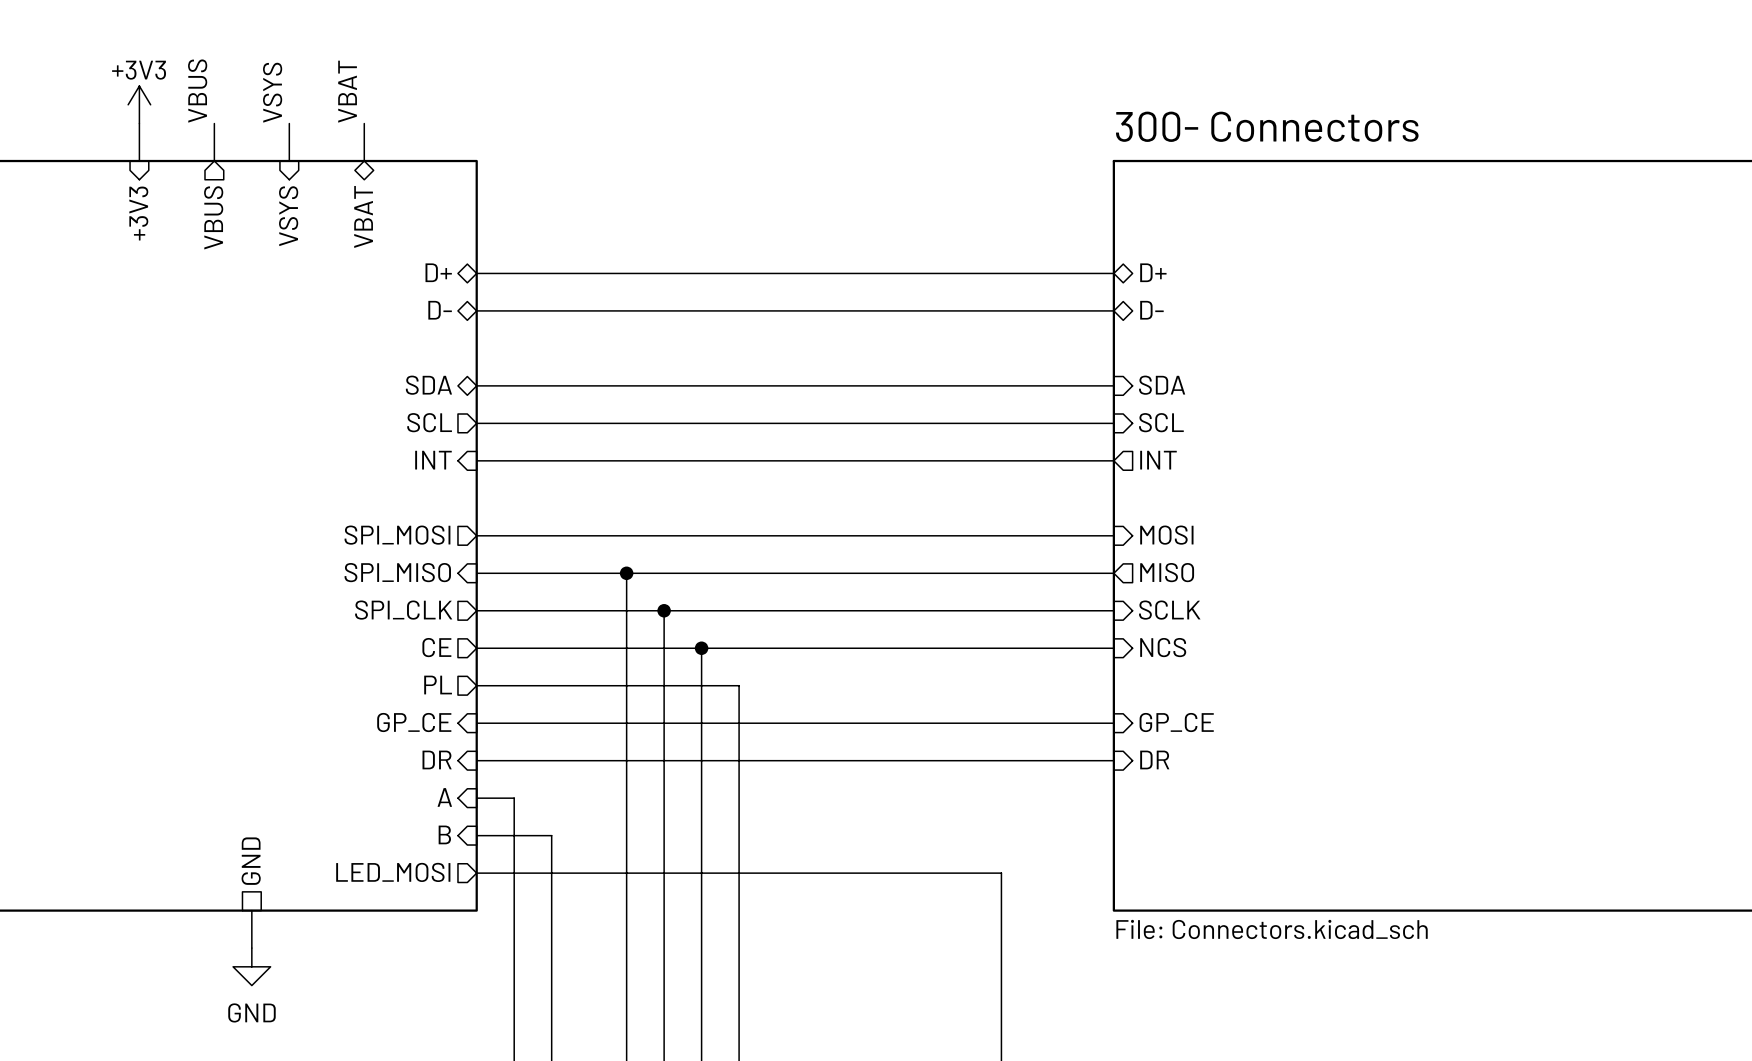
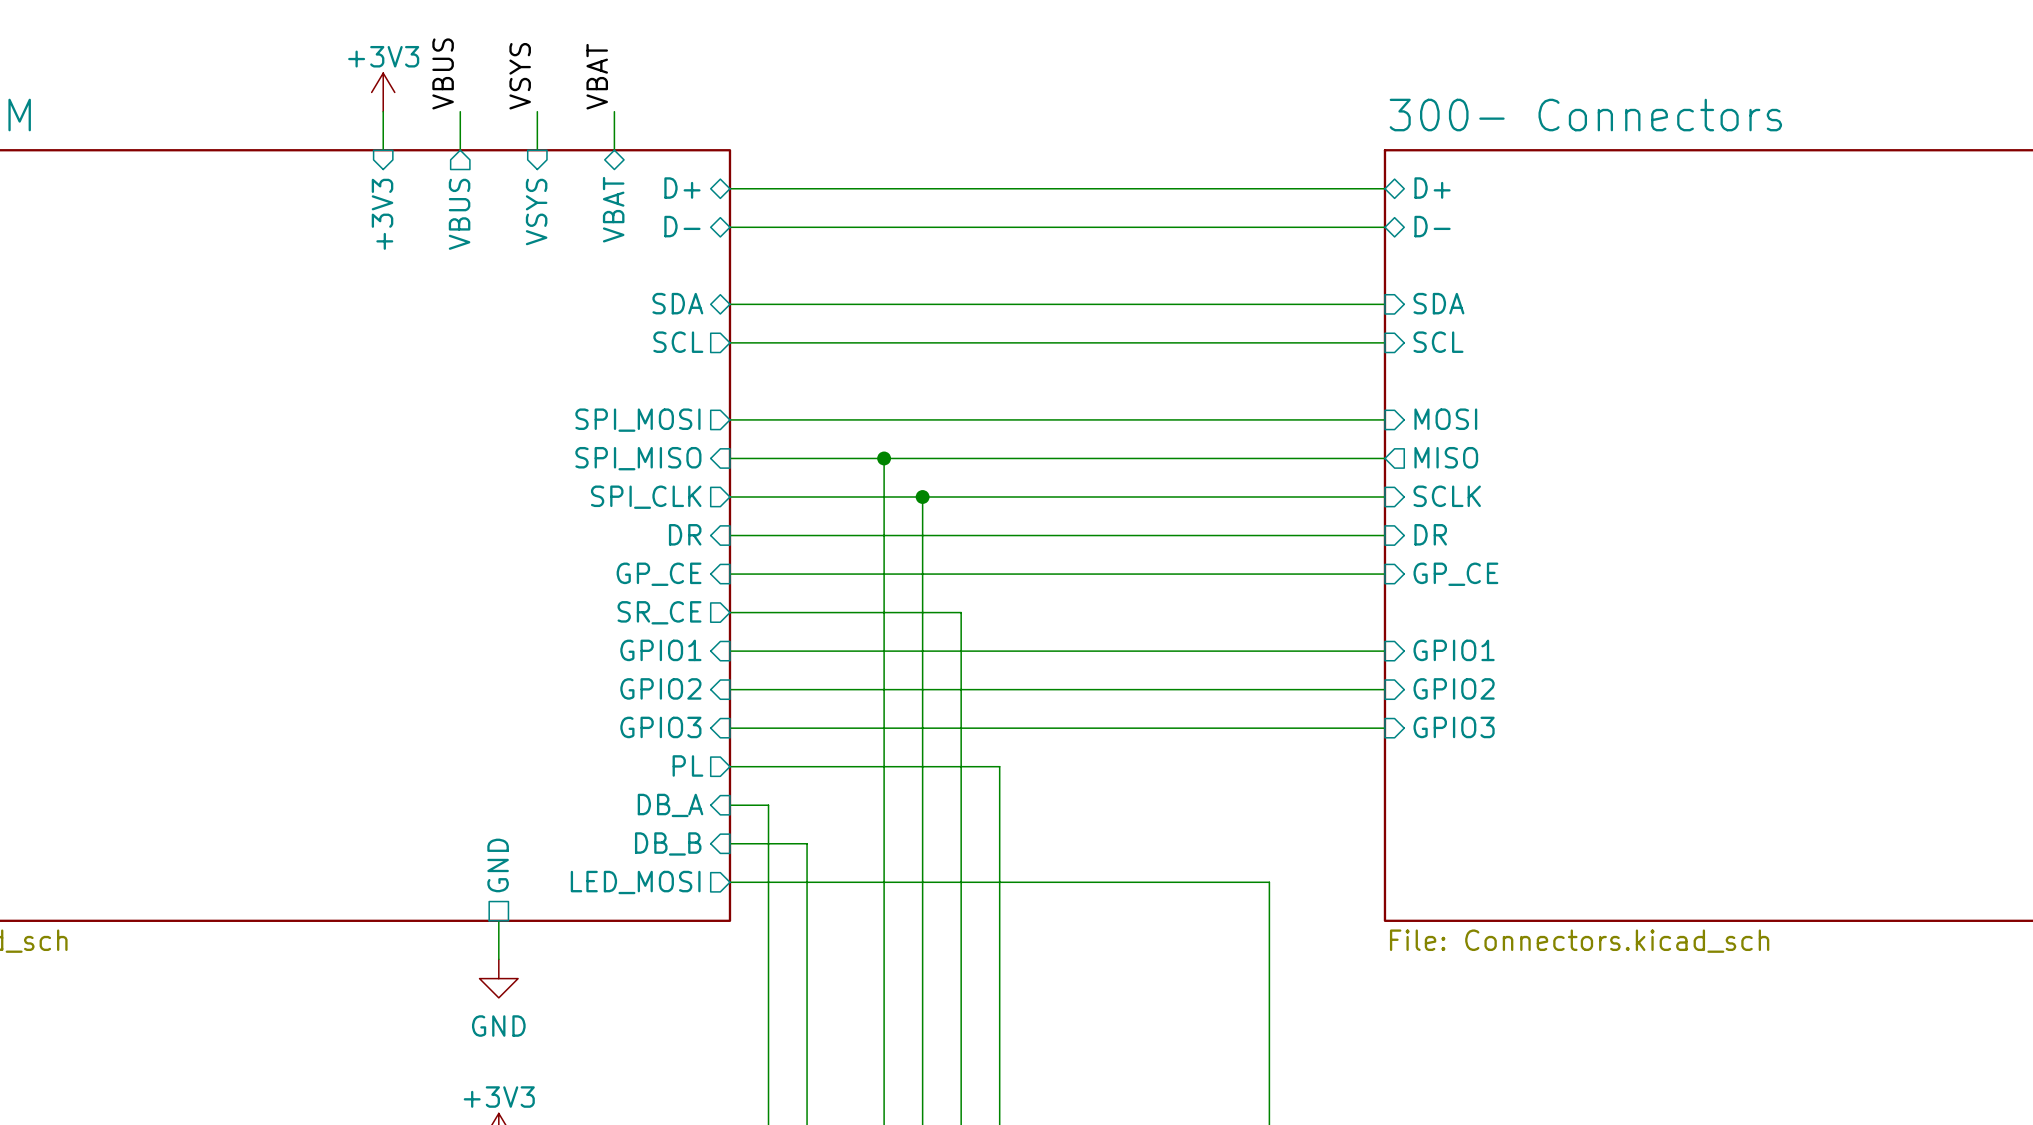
wire: none -> (729, 188) (1384, 188)
sheet pin: none -> D- (682, 226)
sheet pin: none -> D- (1432, 226)
sheet pin position: D+ (438, 272) -> D+ (682, 188)
sheet pin position: D+ (1153, 272) -> D+ (1432, 188)
wire: (476, 273) (1113, 273) -> (729, 227) (1384, 227)
sheet pin: D- (440, 310) -> SDA (677, 303)
sheet pin shape: bidirectional (1151, 310) -> input (1438, 303)
sheet pin: D- (1151, 310) -> SDA (1438, 303)
sheet pin: none -> SCL (678, 342)
sheet pin: none -> SCL (1438, 342)
sheet pin: SDA (428, 385) -> none
wire: (476, 385) (1113, 385) -> (729, 342) (1384, 342)
sheet pin: SDA (1162, 385) -> none
sheet pin: SCL (429, 422) -> SPI_MOSI (637, 420)
sheet pin: SCL (1161, 422) -> MOSI (1445, 419)
sheet pin: INT (433, 460) -> SPI_MISO (638, 458)
wire: none -> (884, 458) (884, 574)
junction: none -> (884, 458)
sheet pin: INT (1158, 460) -> MISO (1446, 457)
sheet pin: none -> SPI_CLK (646, 497)
wire: none -> (729, 496) (1384, 496)
wire: none -> (922, 496) (922, 612)
junction: none -> (922, 496)
sheet pin shape: output (397, 535) -> input (685, 534)
sheet pin: SPI_MOSI (397, 535) -> DR (685, 534)
sheet pin: MOSI (1166, 535) -> DR (1430, 534)
sheet pin: SPI_MISO (397, 572) -> GP_CE (659, 574)
sheet pin shape: output (1167, 572) -> input (1455, 574)
sheet pin: MISO (1167, 572) -> GP_CE (1455, 574)
junction: (626, 573) -> none
sheet pin: SPI_CLK (403, 610) -> SR_CE (659, 612)
junction: (664, 610) -> none
wire: (701, 610) (1113, 610) -> (961, 612) (961, 651)
sheet pin position: SCLK (1169, 610) -> SCLK (1447, 496)
sheet pin shape: output (436, 647) -> input (660, 650)
sheet pin: CE (436, 647) -> GPIO1 (660, 650)
sheet pin: NCS (1163, 647) -> GPIO1 (1454, 650)
junction: (701, 648) -> none
sheet pin shape: output (438, 685) -> input (660, 688)
sheet pin: PL (438, 685) -> GPIO2 (660, 688)
wire: (739, 685) (739, 760) (1113, 760) -> (999, 689) (1384, 689)
sheet pin: none -> GPIO2 (1454, 688)
sheet pin: GP_CE (414, 722) -> GPIO3 (660, 727)
sheet pin: GP_CE (1176, 722) -> GPIO3 (1454, 727)
sheet pin shape: input (437, 759) -> output (687, 765)
sheet pin: DR (437, 759) -> PL (687, 765)
sheet pin: DR (1154, 759) -> none
sheet pin: A (444, 797) -> DB_A (670, 805)
sheet pin: B (444, 834) -> DB_B (668, 843)

